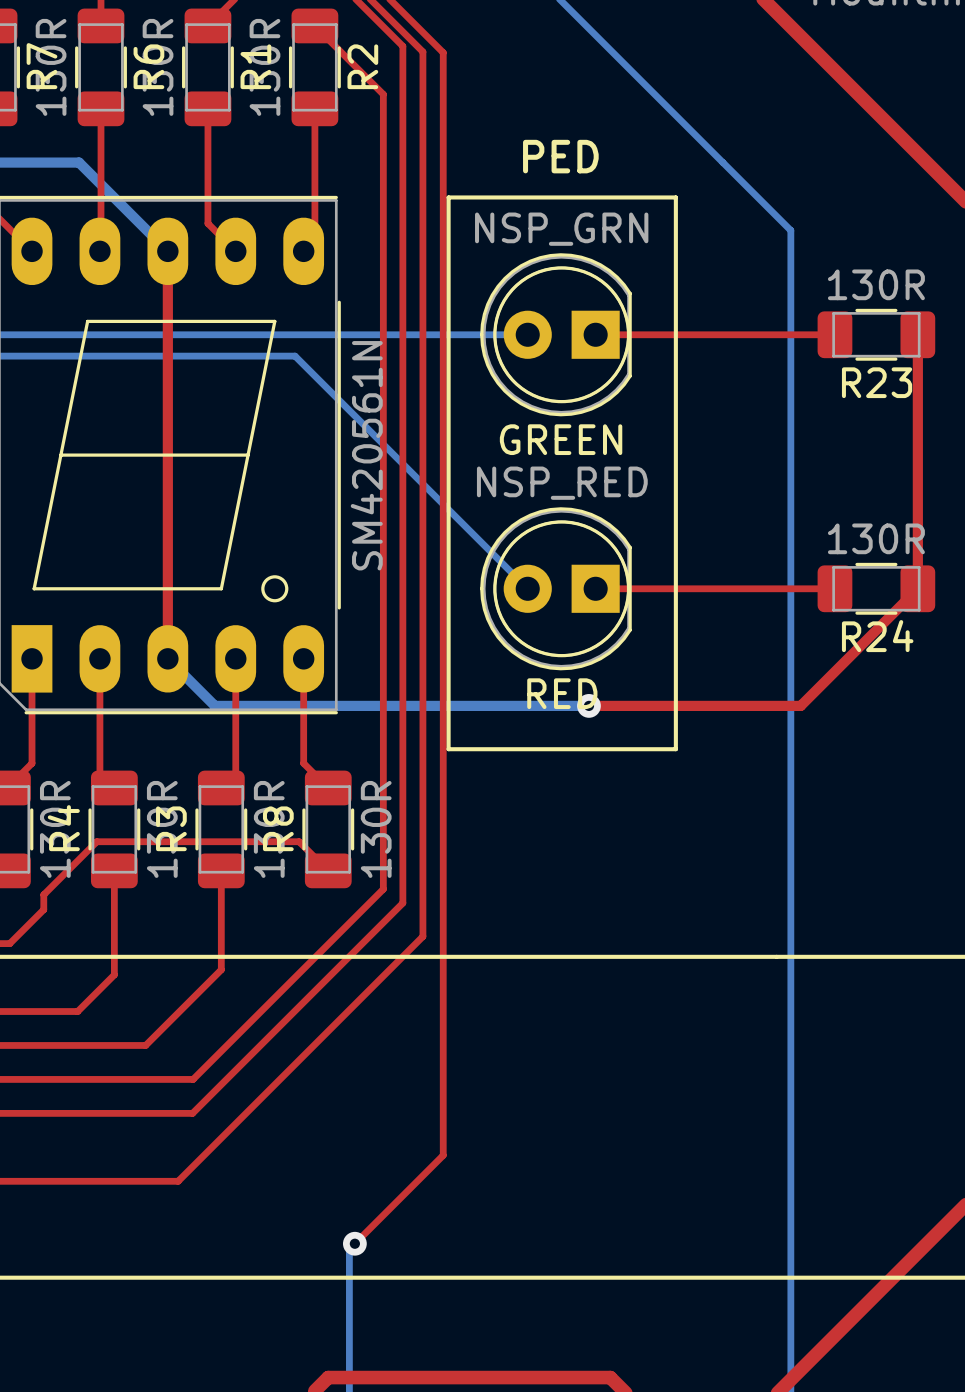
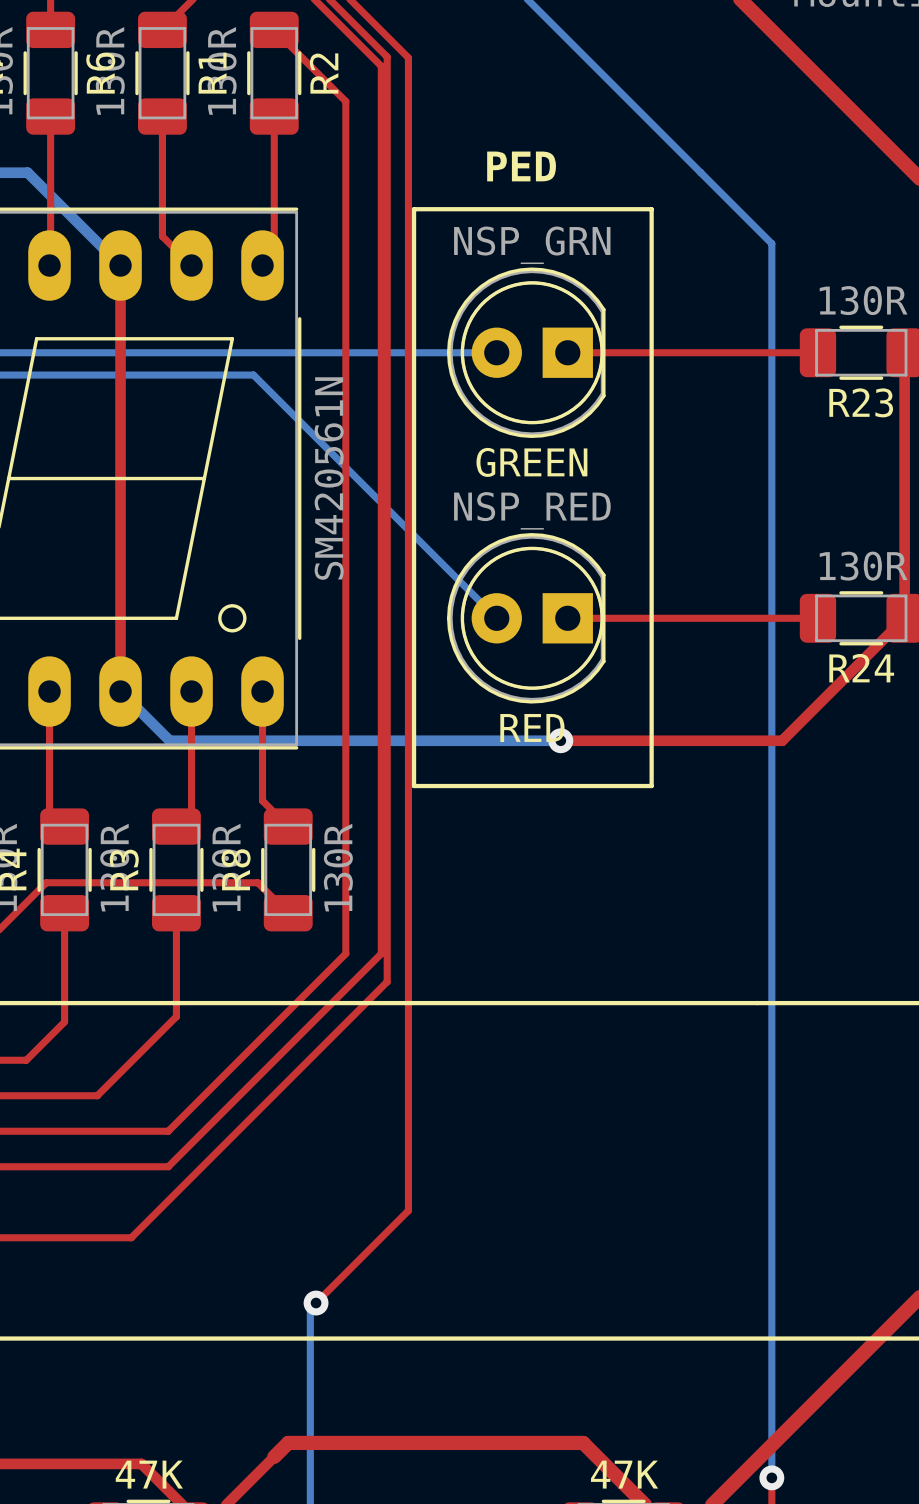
top track: (402, 46) (402, 903) (192, 1113) -> (366, 51) (381, 66) (381, 953) (168, 1166) (146, 1166)
top track: (383, 889) (193, 1079) -> (345, 932) (345, 953) (168, 1131) (146, 1131)

